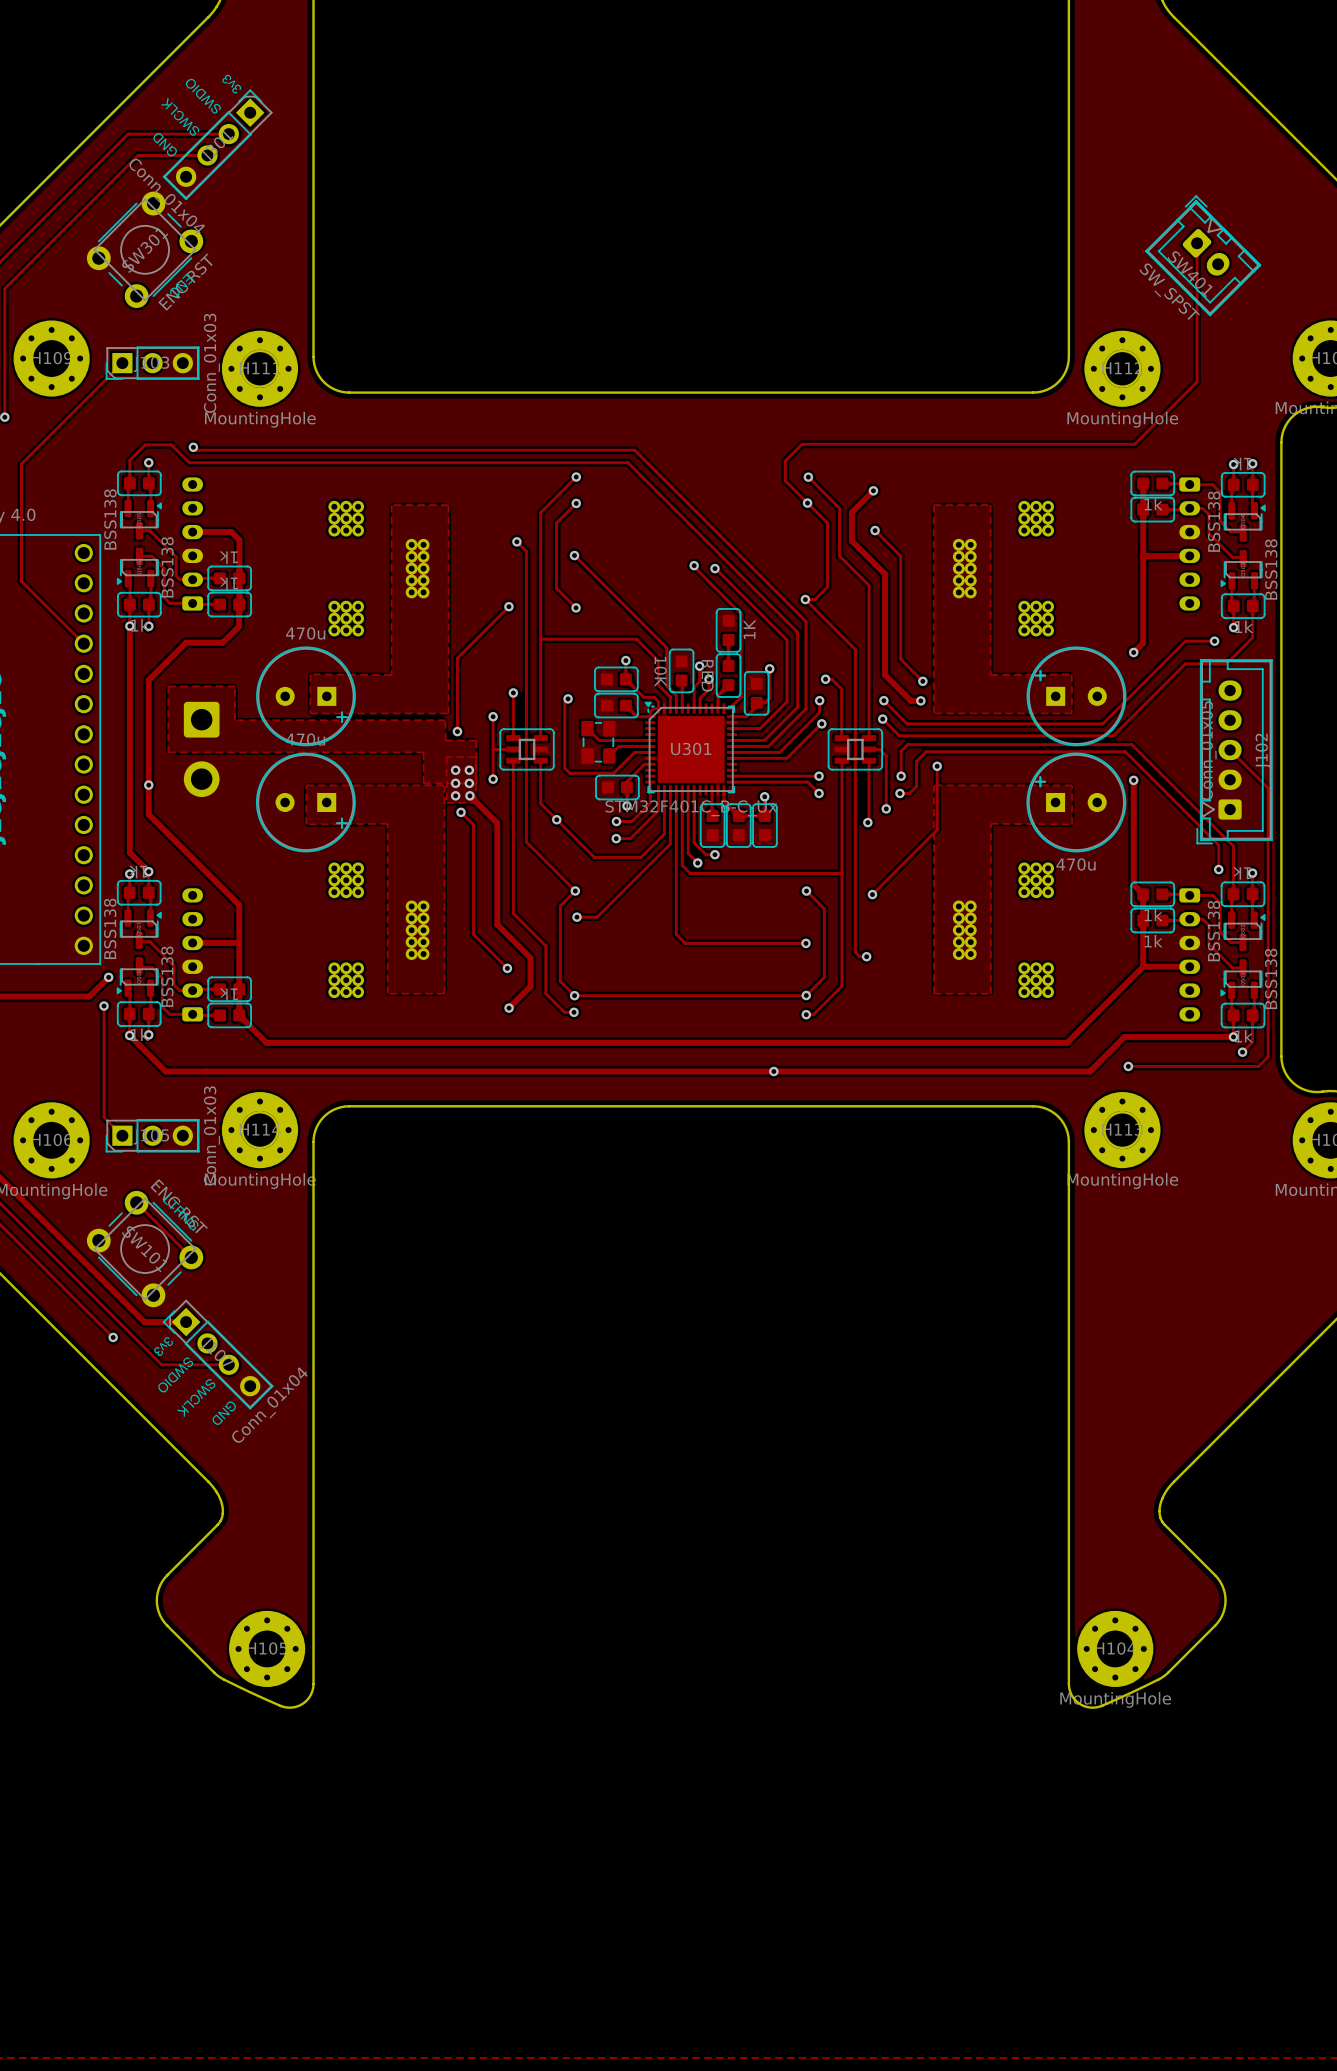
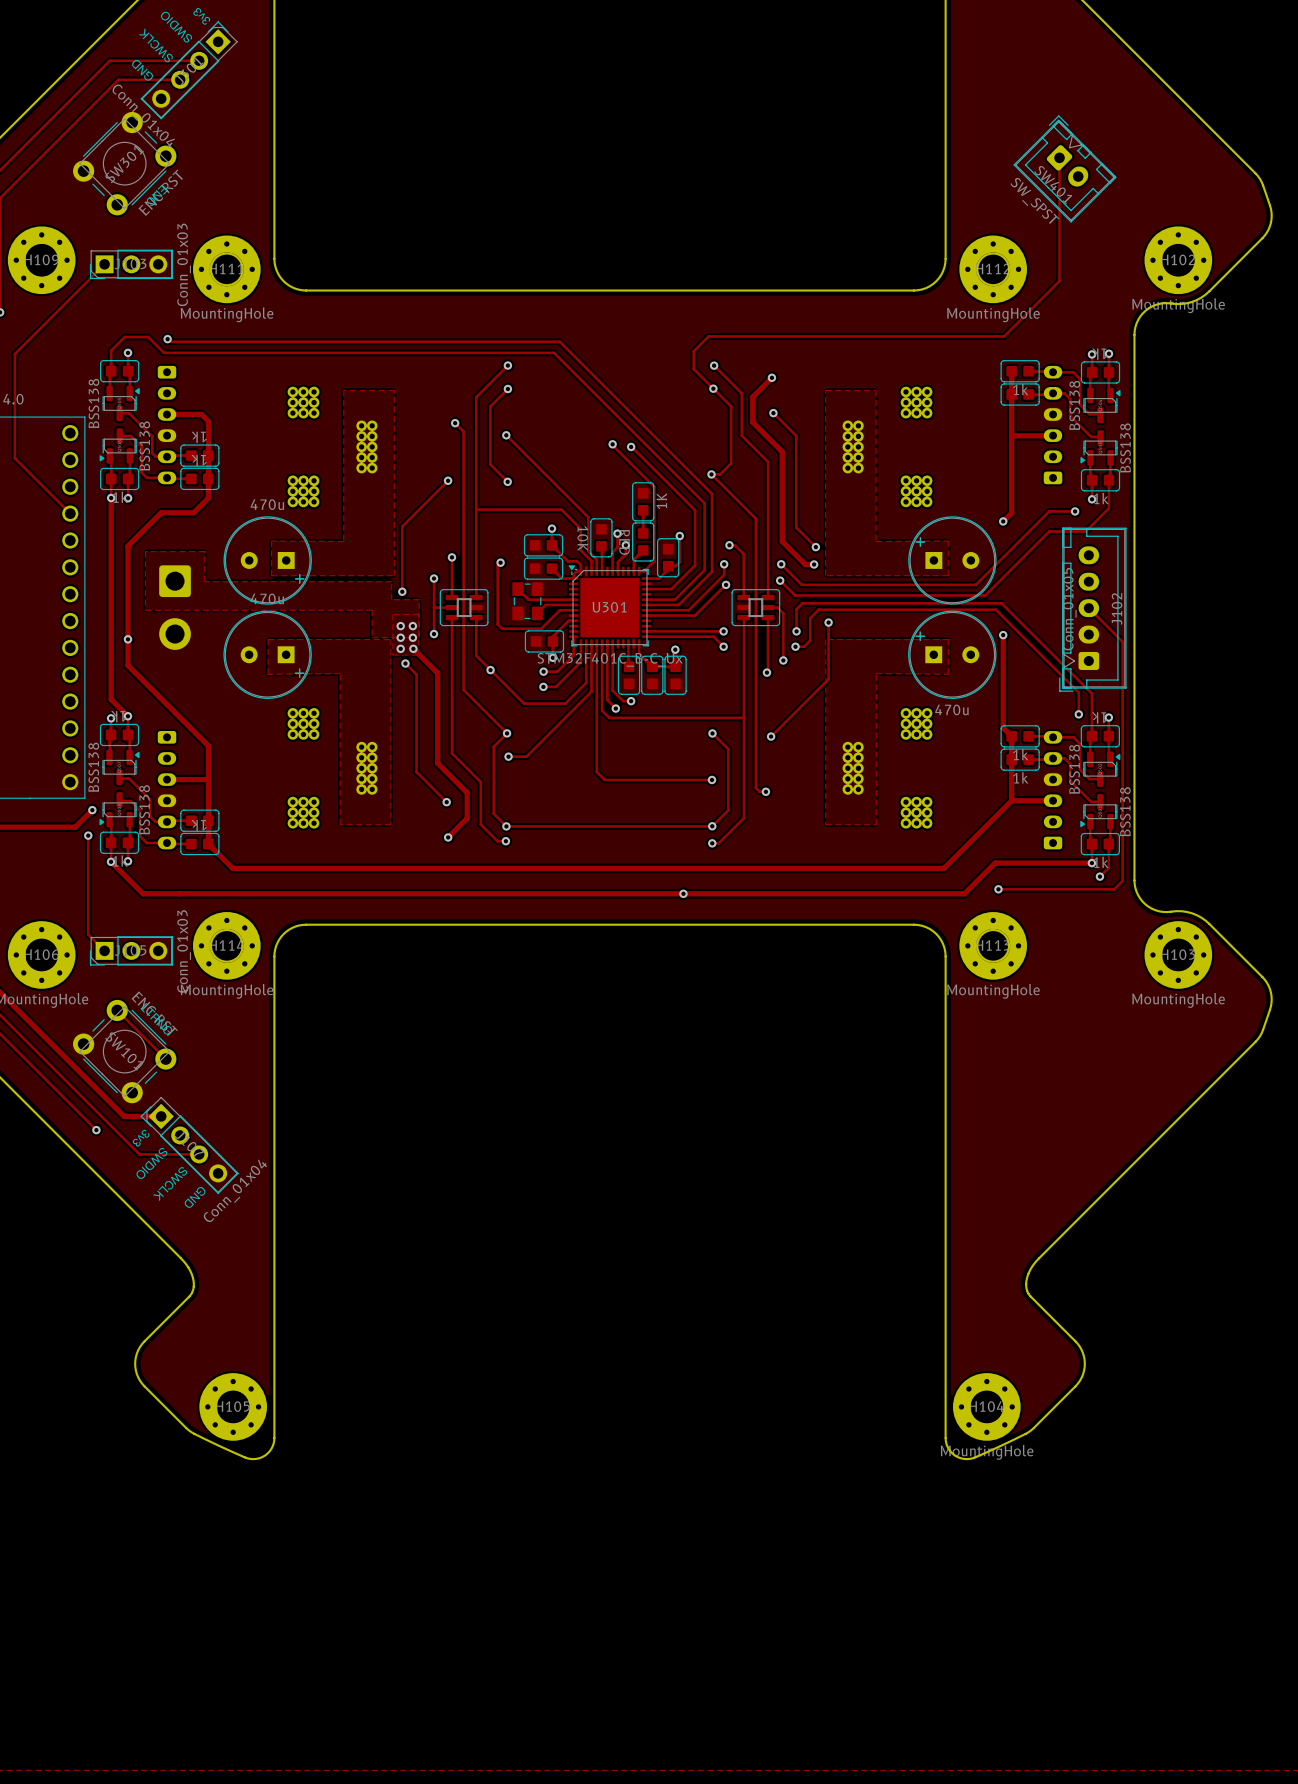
part rotation: 0° (192, 543) -> 180° (167, 425)
part rotation: 0° (1189, 543) -> 180° (1053, 425)
part rotation: 0° (192, 954) -> 180° (167, 790)
part rotation: 0° (1189, 954) -> 180° (1053, 790)

